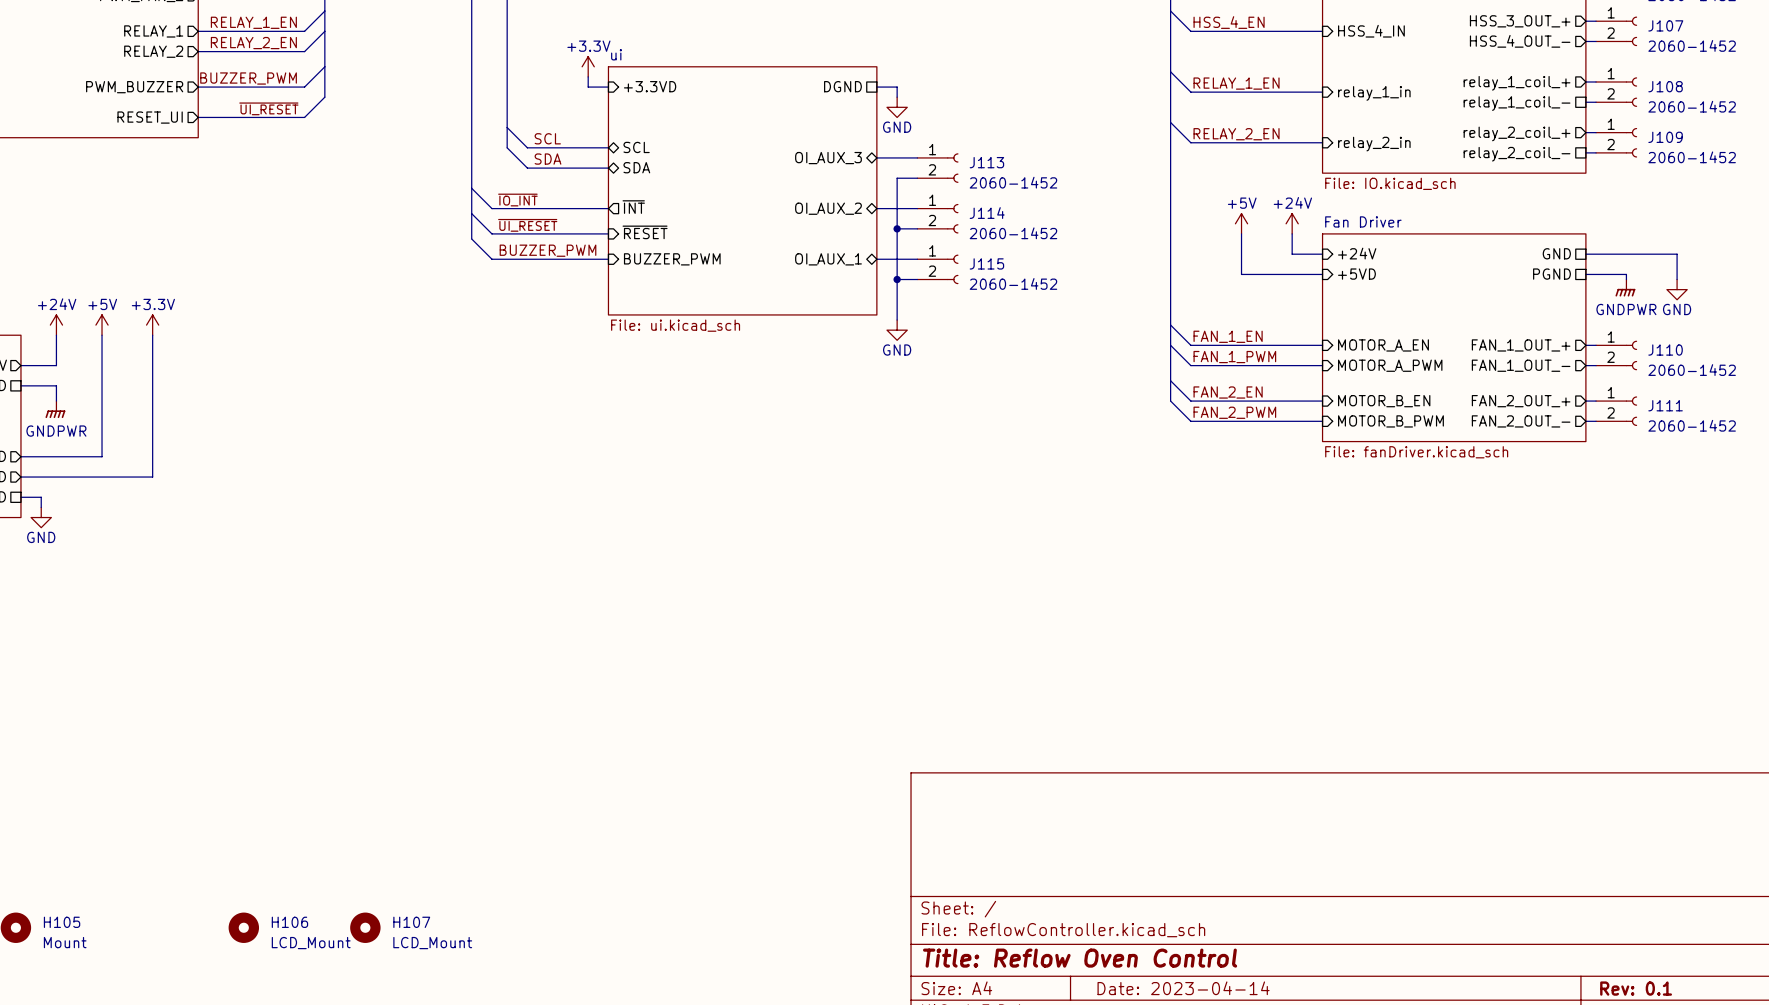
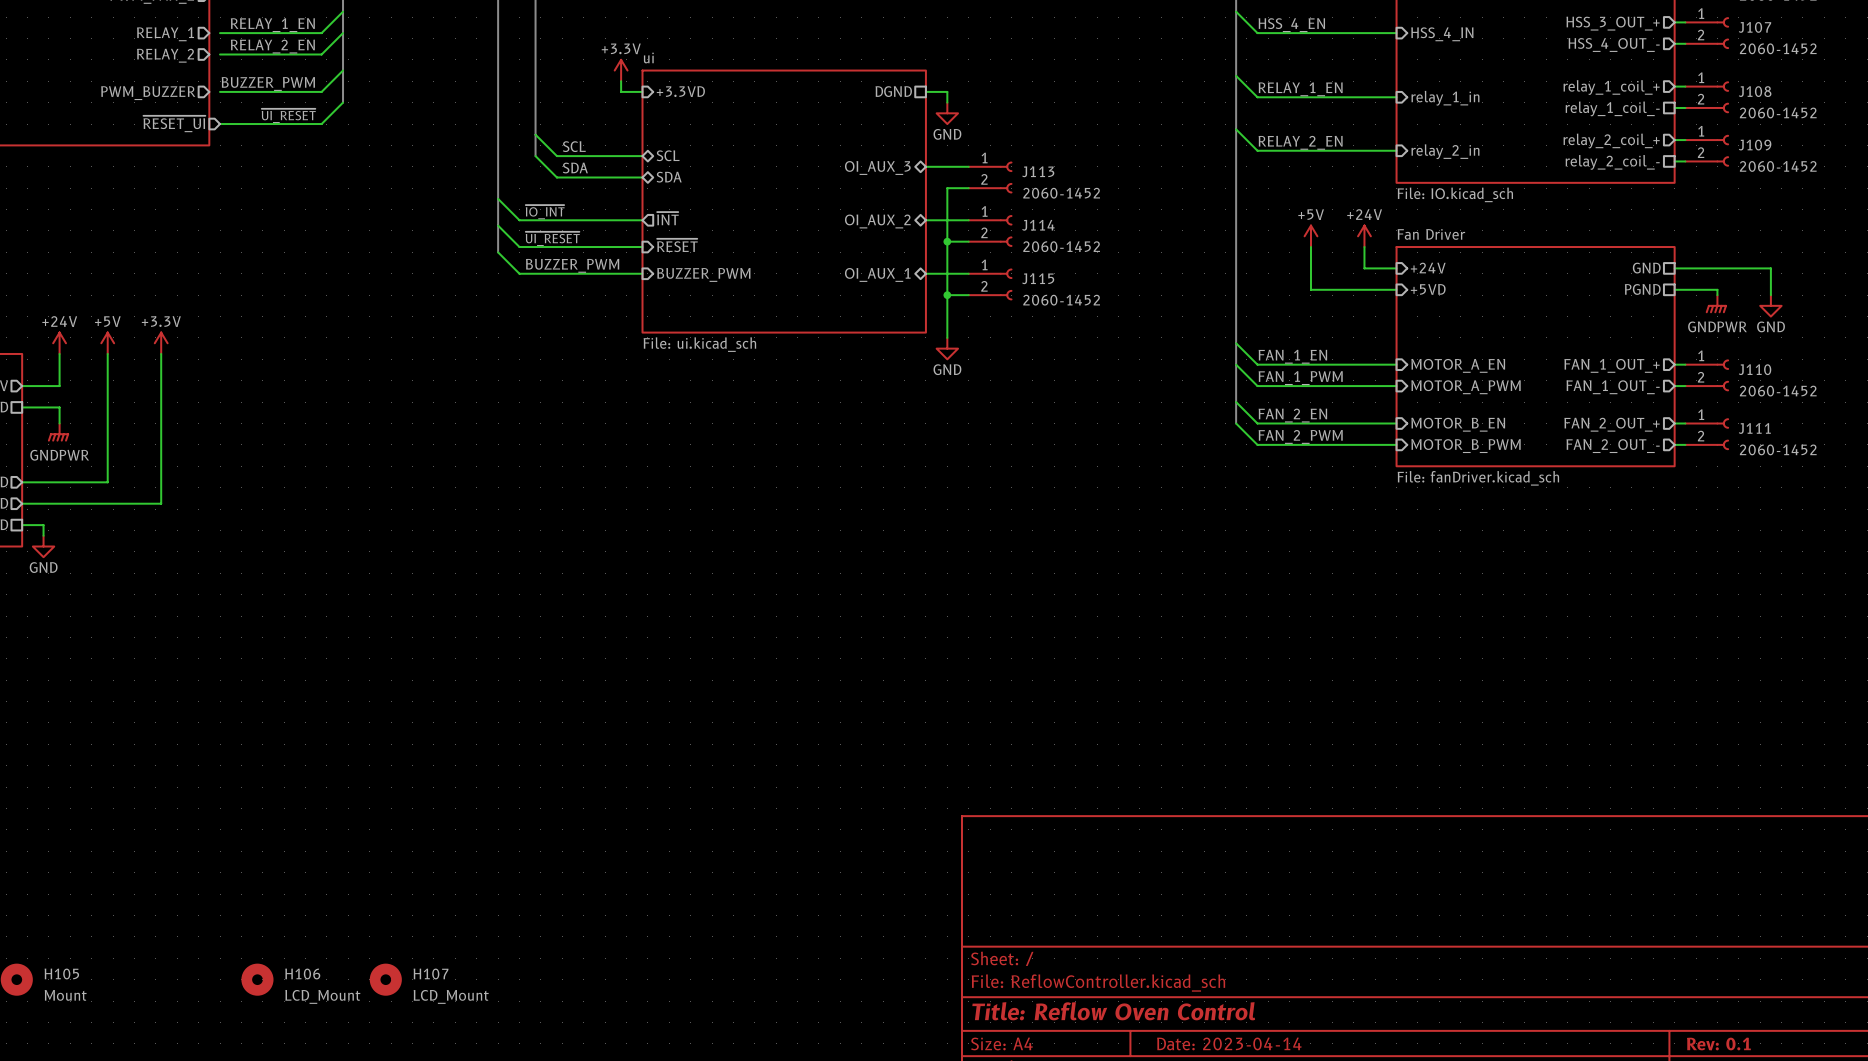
wire: (198, 31) (208, 31) -> none
wire: (198, 51) (208, 51) -> none
wire: (198, 87) (208, 87) -> none
sheet pin: RESET_UI (150, 117) -> ~{RESET_UI} (174, 123)
wire: (198, 117) (208, 117) -> none

